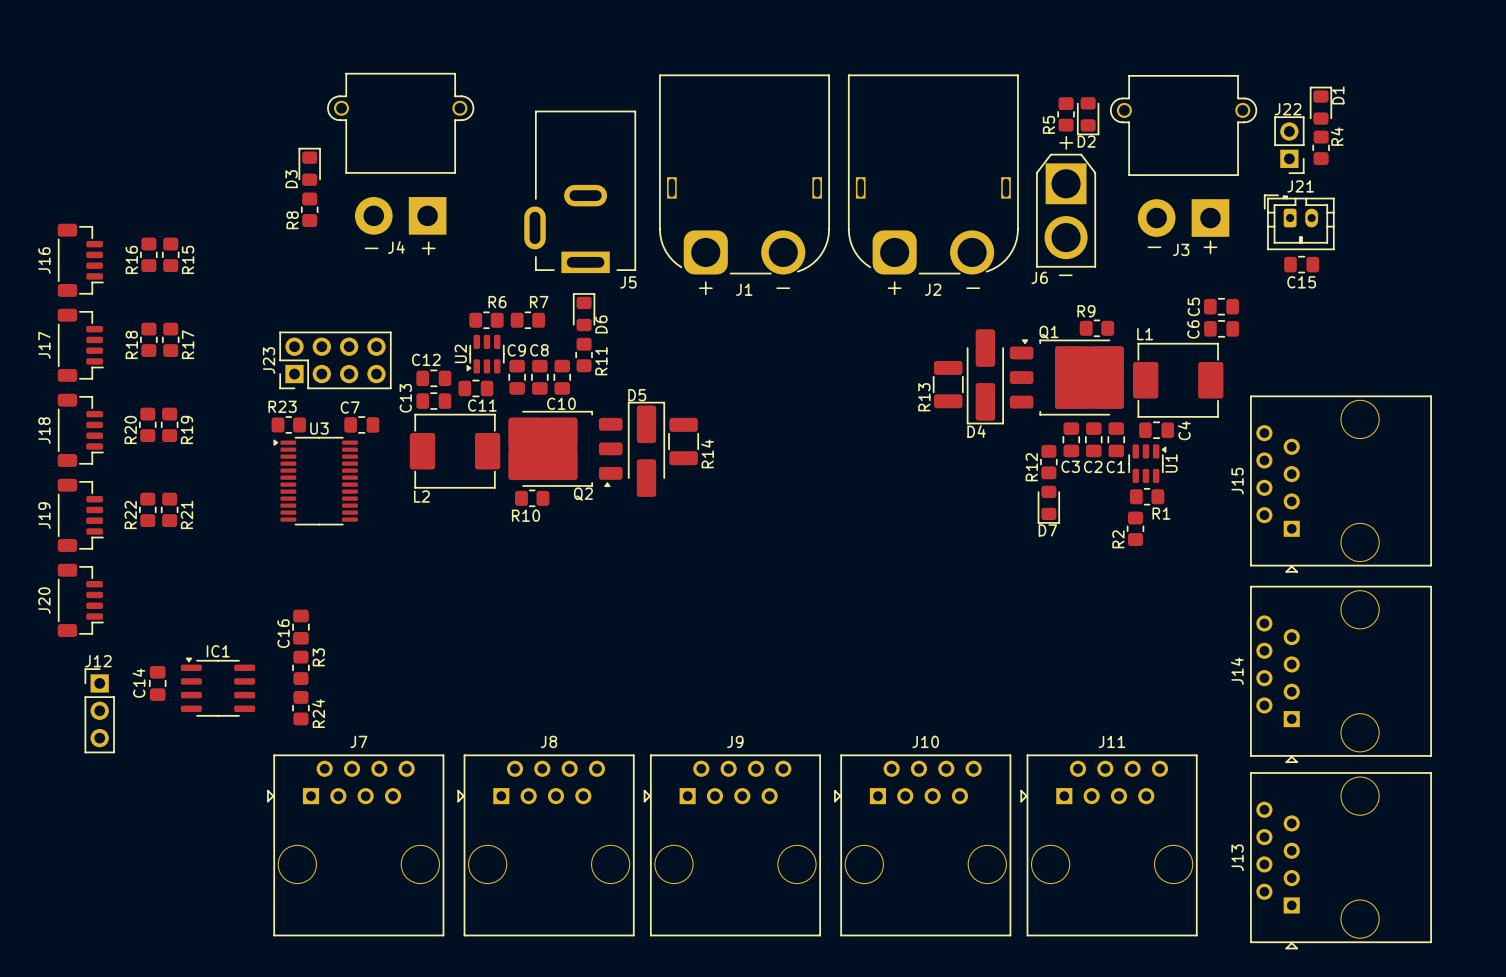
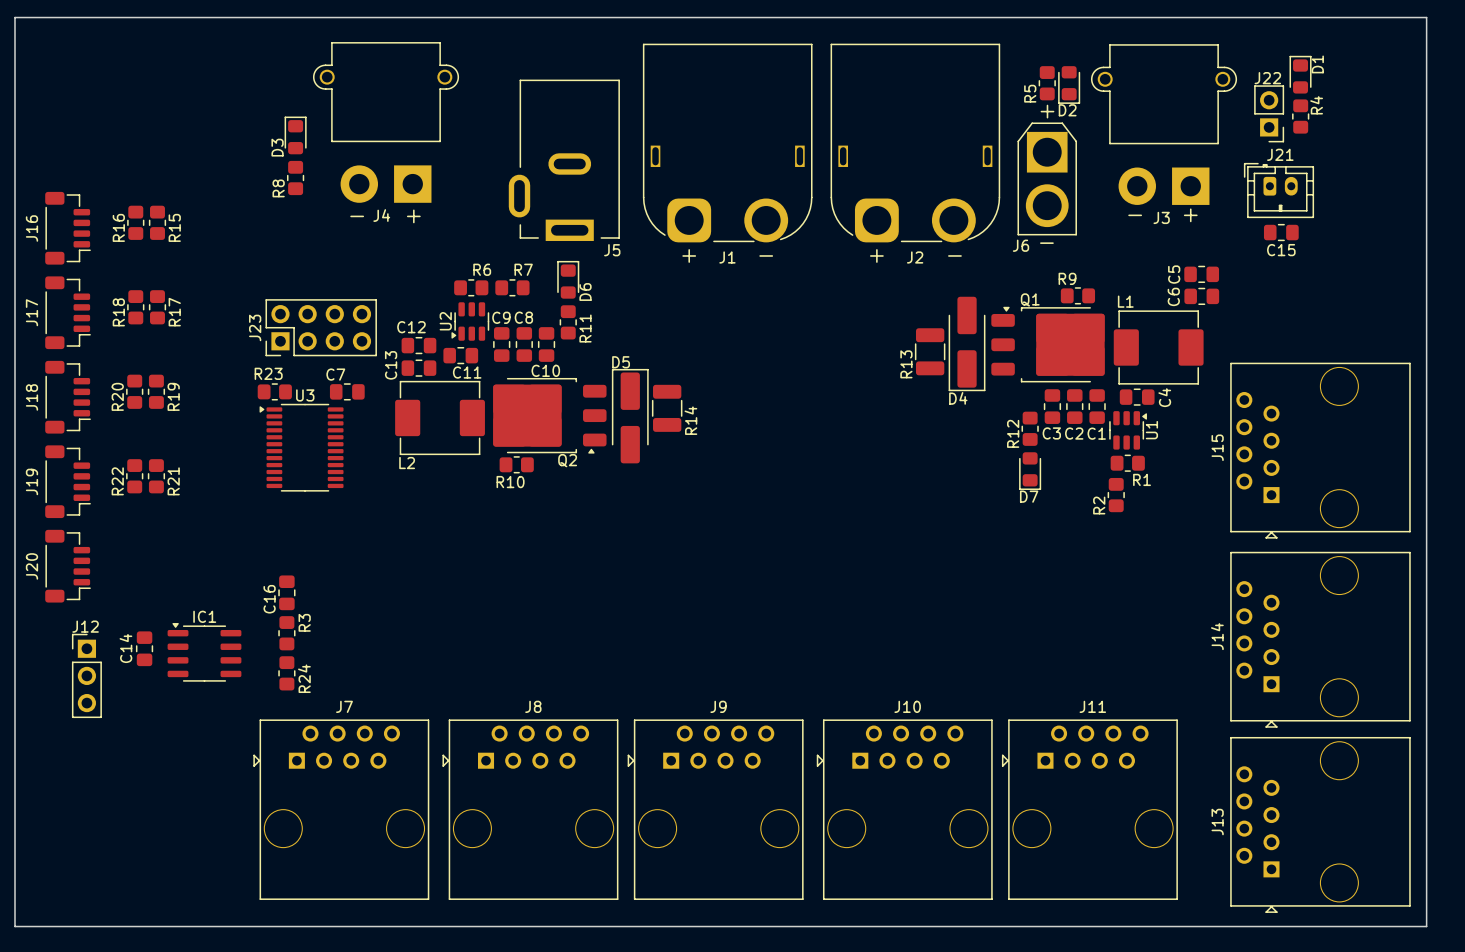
board edge: none -> (15, 17) (1426, 17) (1426, 926) (15, 926) (15, 17)

